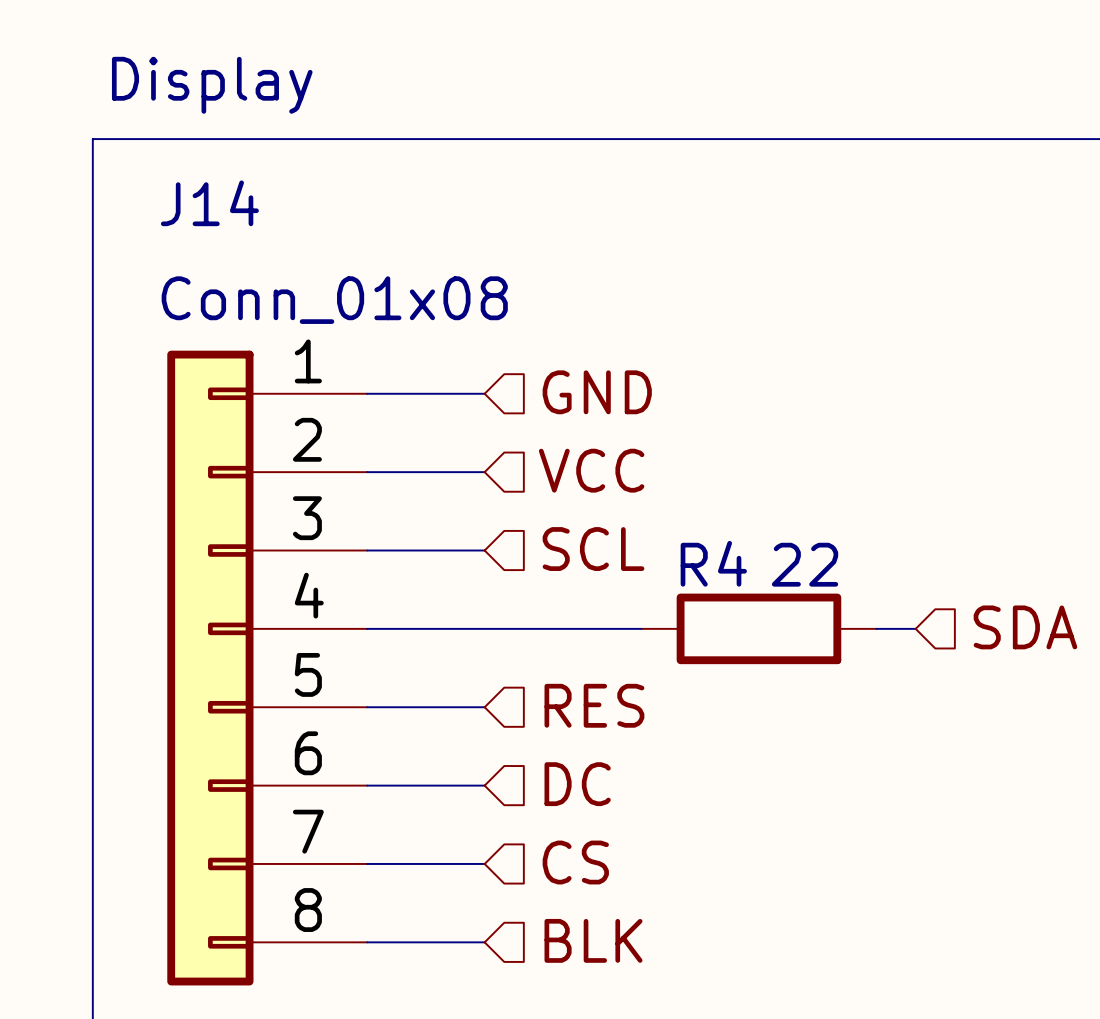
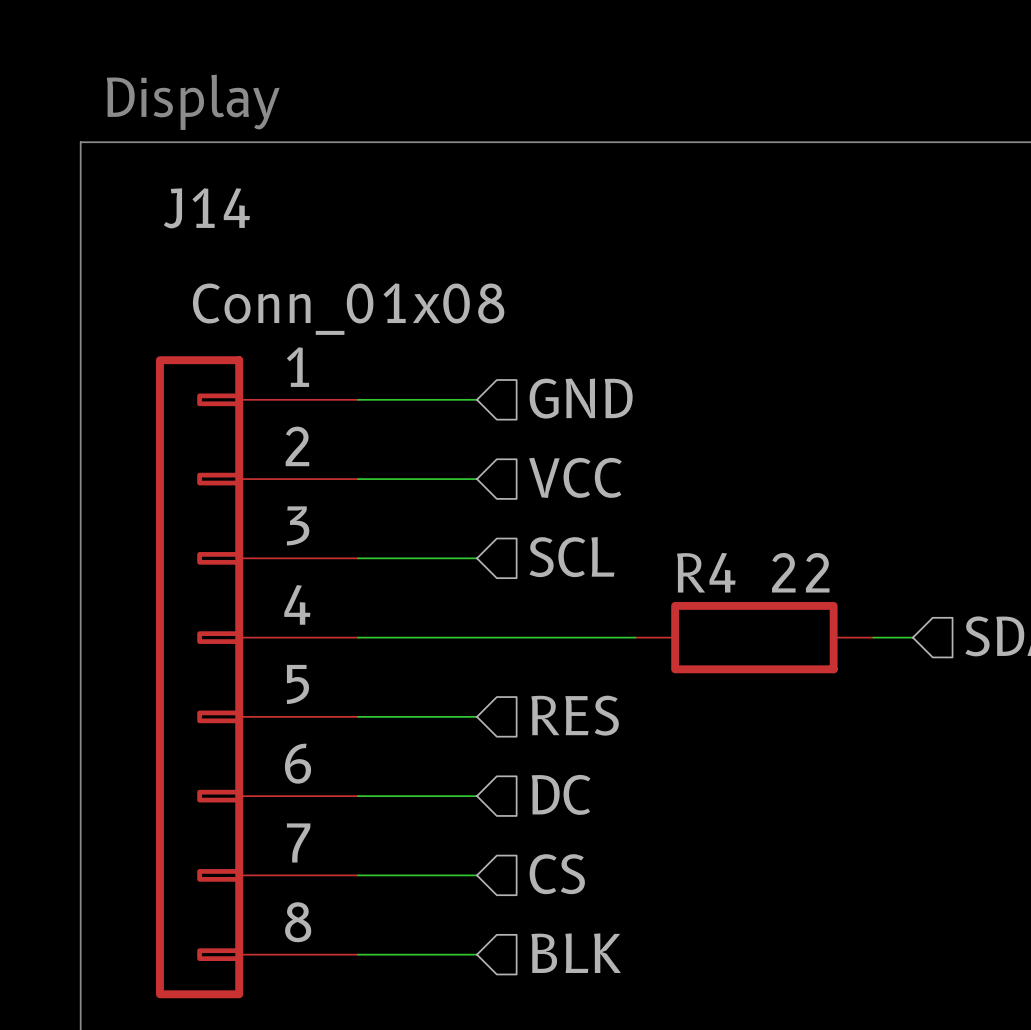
text position: Display (212, 85) -> Display (193, 102)

